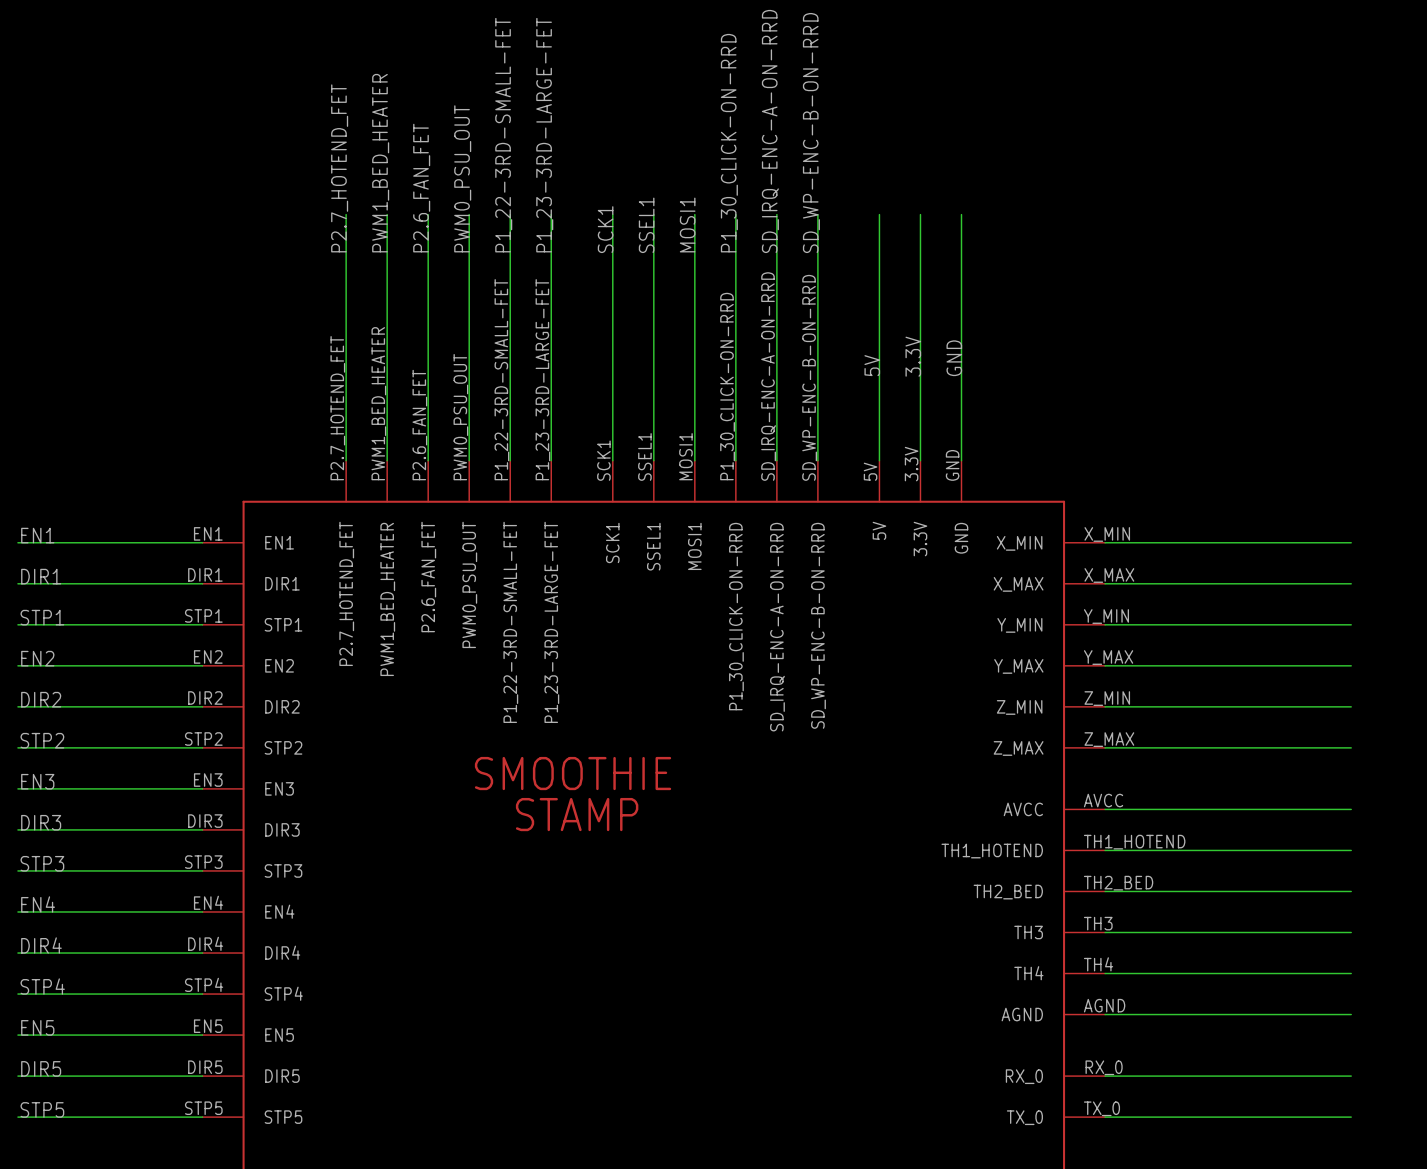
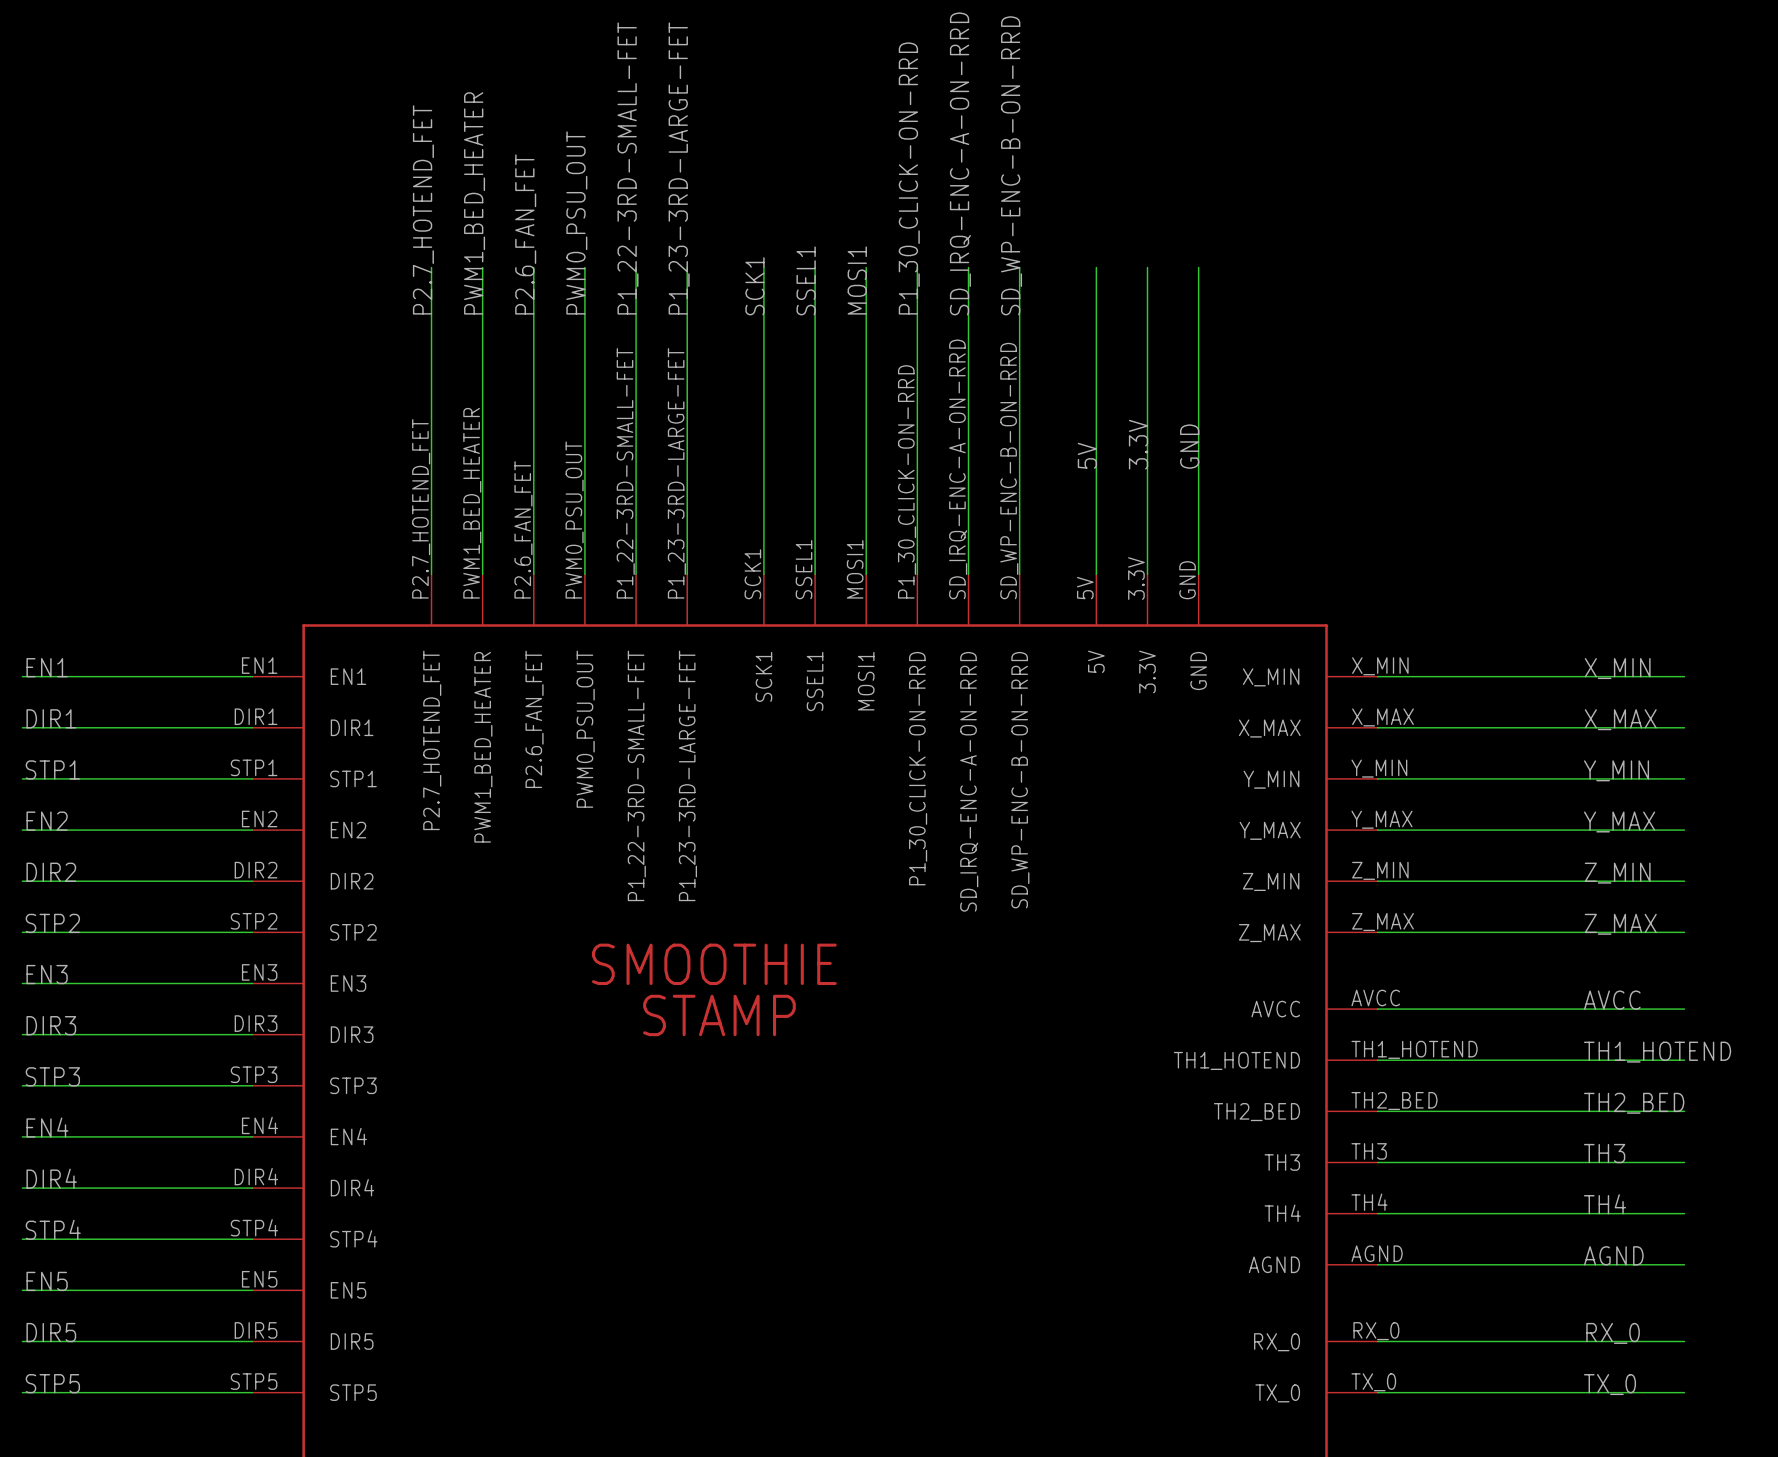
label: none -> X_MIN (1617, 668)
label: none -> X_MAX (1620, 719)
label: none -> Y_MIN (1616, 770)
label: none -> Y_MAX (1619, 821)
label: none -> Z_MIN (1617, 873)
label: none -> Z_MAX (1620, 924)
label: none -> AVCC (1612, 1000)
label: none -> TH1_HOTEND (1657, 1052)
label: none -> TH2_BED (1634, 1103)
label: none -> TH3 (1604, 1153)
label: none -> TH4 (1605, 1204)
label: none -> AGND (1613, 1255)
label: none -> RX_0 (1613, 1333)
label: none -> TX_0 (1610, 1384)

